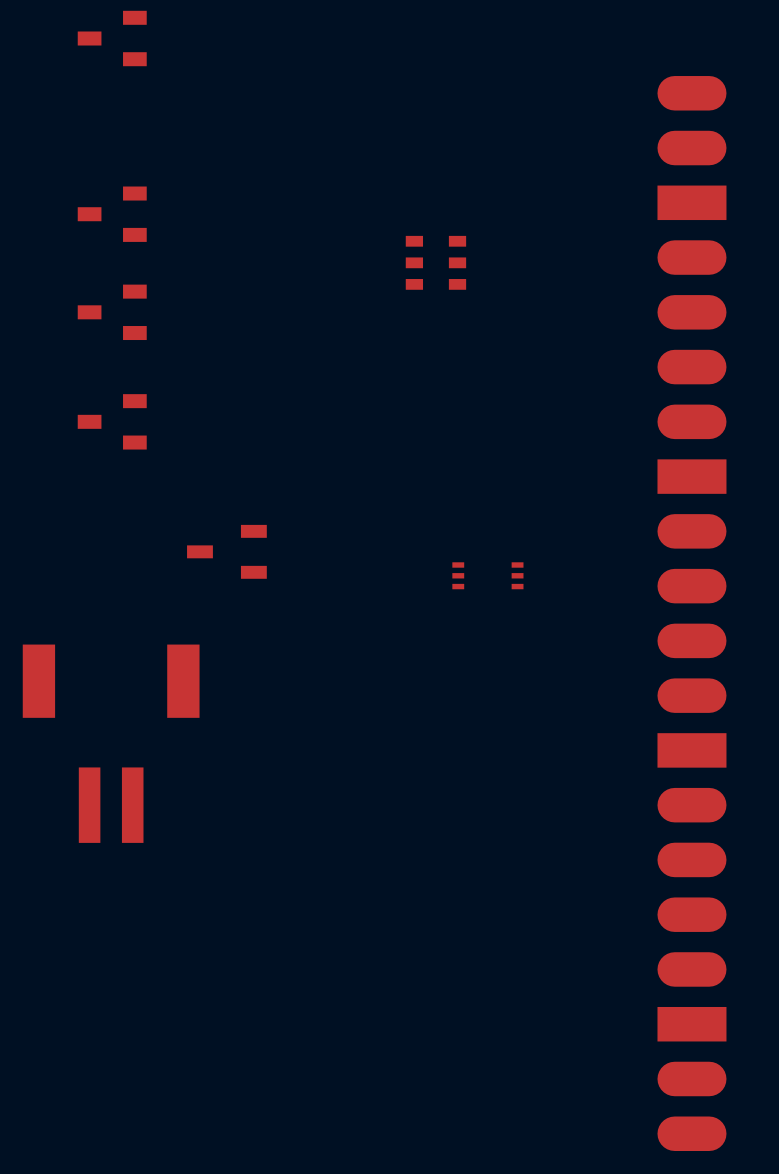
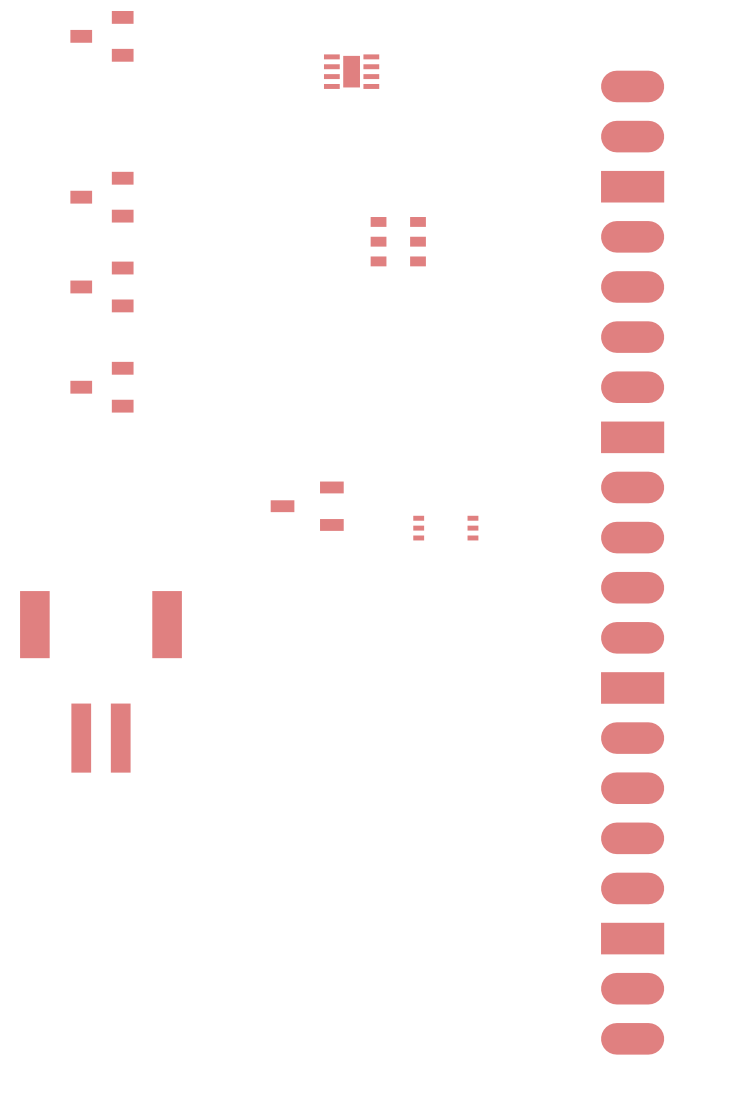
part: none -> (351, 71)
part position: (226, 551) -> (307, 506)

